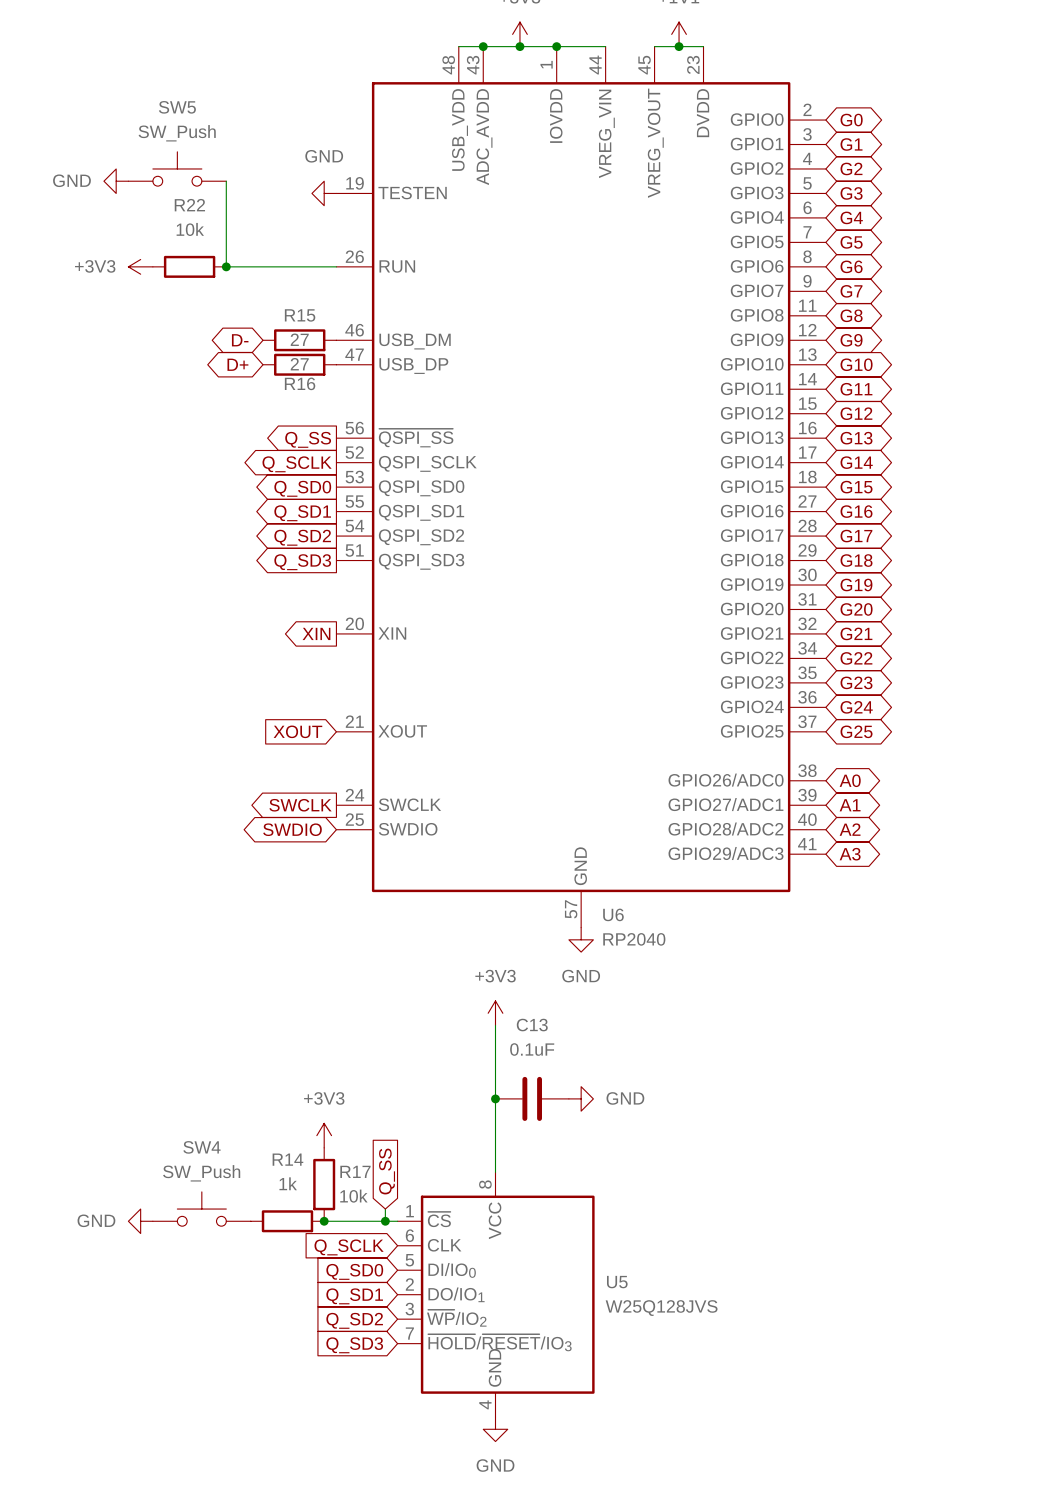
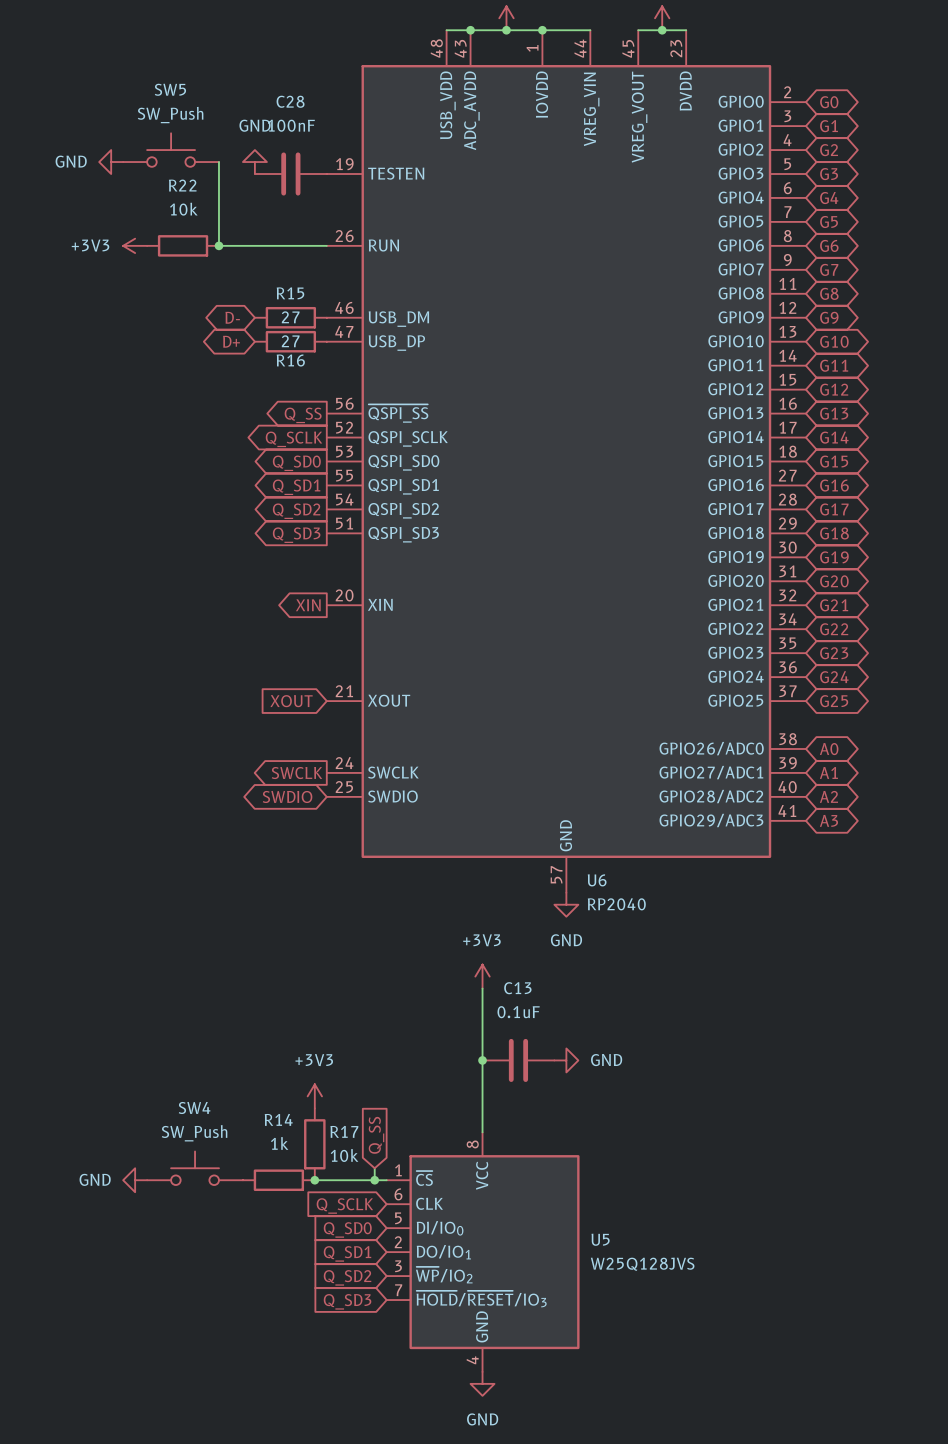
C28: none -> 100nF (290, 174)
power symbol rotation: 0° (324, 193) -> 90° clockwise (254, 162)
power symbol position: GND (324, 193) -> GND (254, 162)

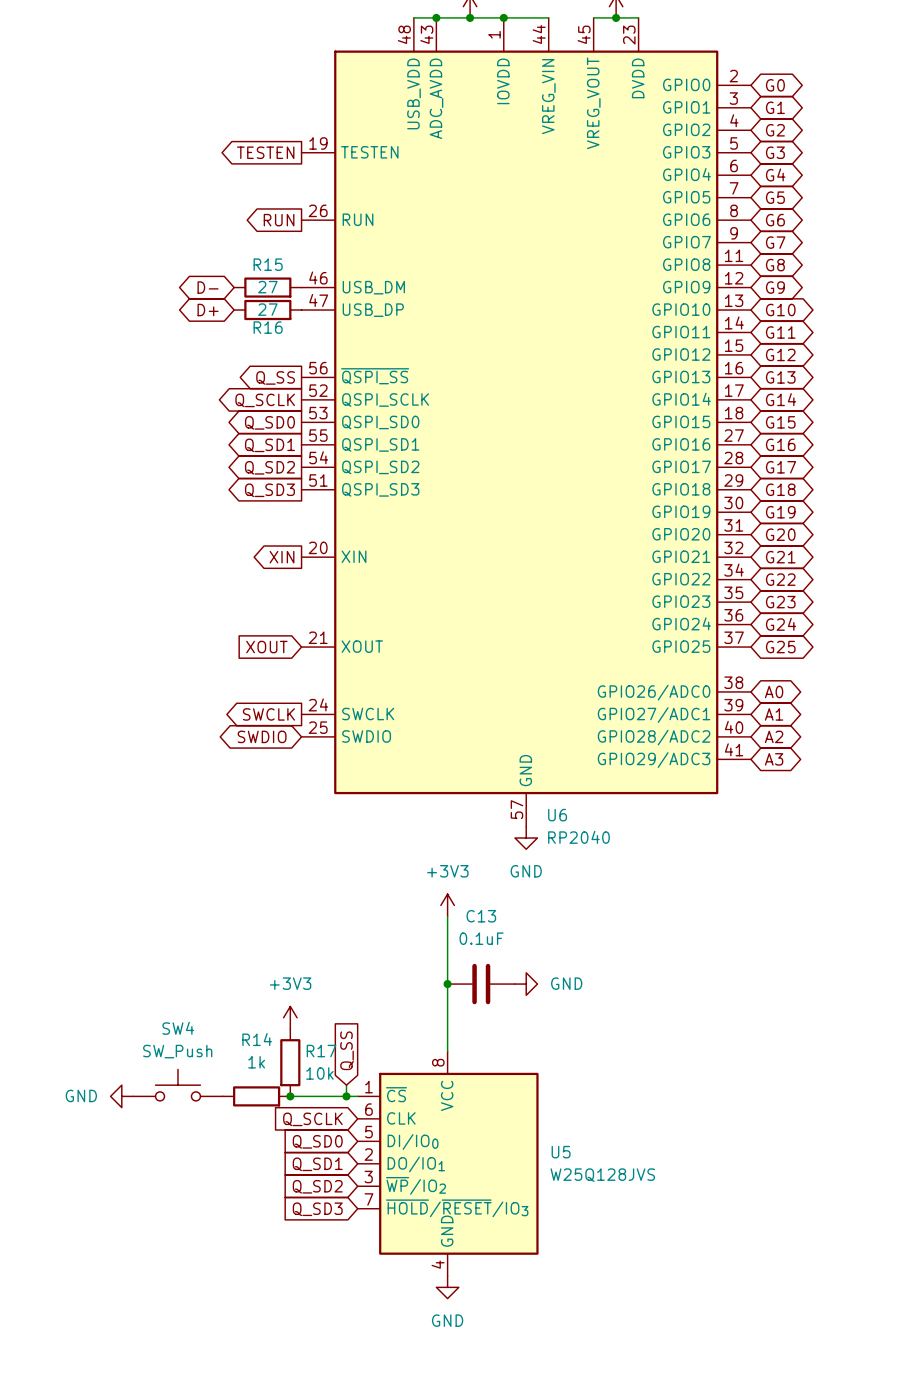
SW5: SW_Push (171, 150) -> none
power symbol: GND (111, 162) -> none
wire: (218, 162) (218, 245) (326, 245) -> none
power symbol: GND (254, 162) -> none
C28: 100nF (290, 174) -> none
global label: none -> TESTEN (265, 152)
power symbol: +3V3 (135, 245) -> none
R22: 10k (183, 245) -> none
junction: (218, 245) -> none
global label: none -> RUN (279, 220)

